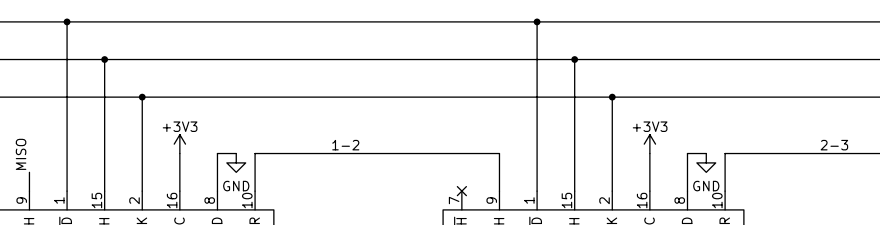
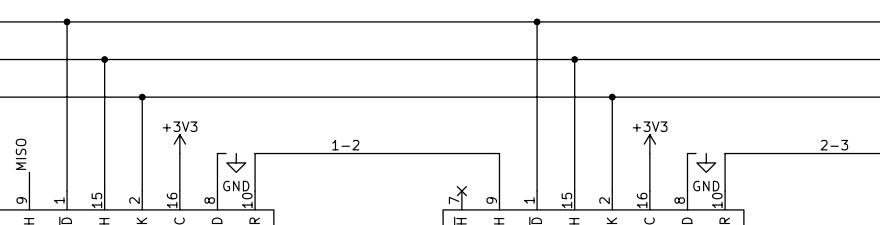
wire: (225, 153) (236, 153) -> none
wire: (696, 153) (706, 153) -> none

